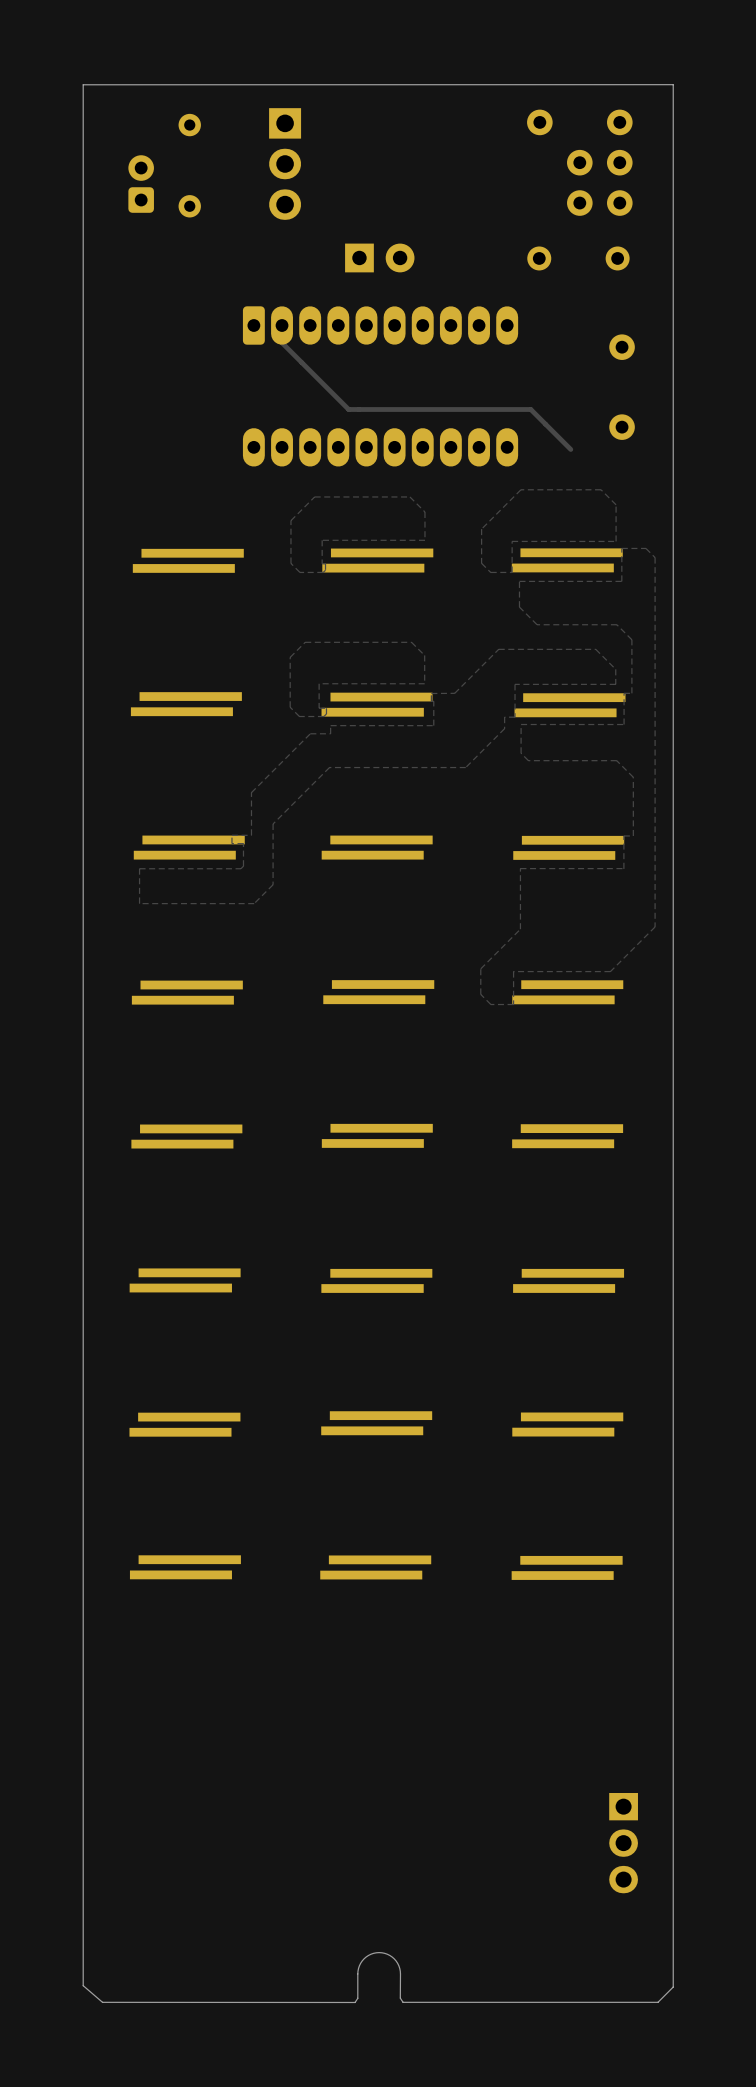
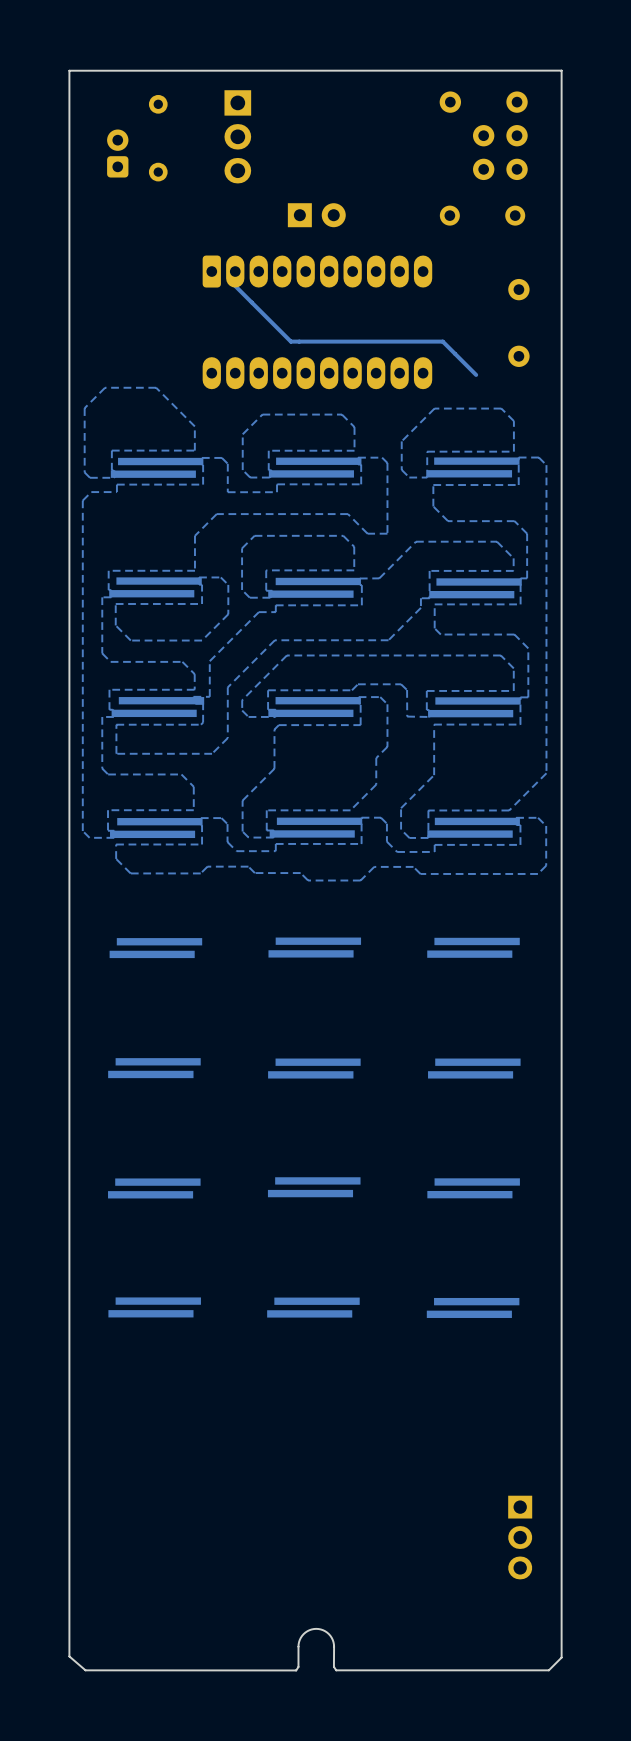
zone outline: none -> (156, 387) (194, 426) (194, 450) (111, 450) (111, 470) (116, 474) (113, 477) (90, 477) (84, 472) (84, 408) (105, 387) (156, 387)
zone outline: none -> (201, 464) (201, 457) (221, 457) (227, 463) (227, 492) (277, 492) (277, 484) (361, 484) (361, 464) (358, 464) (358, 457) (382, 457) (387, 462) (387, 533) (367, 533) (347, 514) (216, 514) (194, 535) (194, 570) (108, 570) (108, 590) (111, 590) (111, 597) (102, 597) (102, 653) (110, 661) (182, 661) (194, 674) (194, 689)
zone outline: none -> (202, 464) (203, 484) (116, 484) (116, 492) (91, 492) (82, 500) (82, 831) (89, 837) (114, 837) (114, 830) (108, 830) (108, 810) (193, 810) (193, 786) (181, 774) (108, 774) (102, 768) (102, 716) (113, 716) (113, 710) (109, 709) (109, 689) (194, 689)
zone outline: none -> (220, 577) (199, 577) (199, 584) (202, 584) (202, 603) (115, 603) (115, 625) (130, 640) (202, 640) (228, 614) (228, 584) (220, 577)
zone outline: none -> (275, 716) (275, 709) (268, 709) (268, 690) (351, 690) (357, 684) (401, 684) (407, 690) (407, 716) (429, 717) (429, 710) (426, 710) (426, 690) (513, 690) (513, 668) (500, 655) (286, 655) (242, 700) (242, 710) (248, 716) (275, 716)
zone outline: none -> (516, 824) (516, 817) (538, 817) (546, 825) (546, 865) (537, 873) (420, 873) (413, 866) (374, 866) (360, 880) (308, 880) (300, 873) (254, 873) (248, 866) (207, 866) (200, 873) (130, 873) (116, 858) (116, 844) (202, 844) (200, 818) (221, 818) (227, 824) (227, 842) (236, 851) (275, 851) (275, 843) (361, 843)
zone outline: none -> (516, 825) (520, 825) (520, 844) (434, 844) (434, 851) (397, 851) (386, 841) (386, 823) (380, 817) (361, 817) (361, 843)
zone outline: none -> (273, 837) (273, 830) (266, 830) (266, 810) (350, 810) (376, 784) (376, 758) (387, 746) (387, 704) (380, 697) (358, 697) (358, 703) (360, 703) (360, 725) (278, 725) (274, 729) (274, 768) (242, 800) (242, 831) (248, 837) (273, 837)

